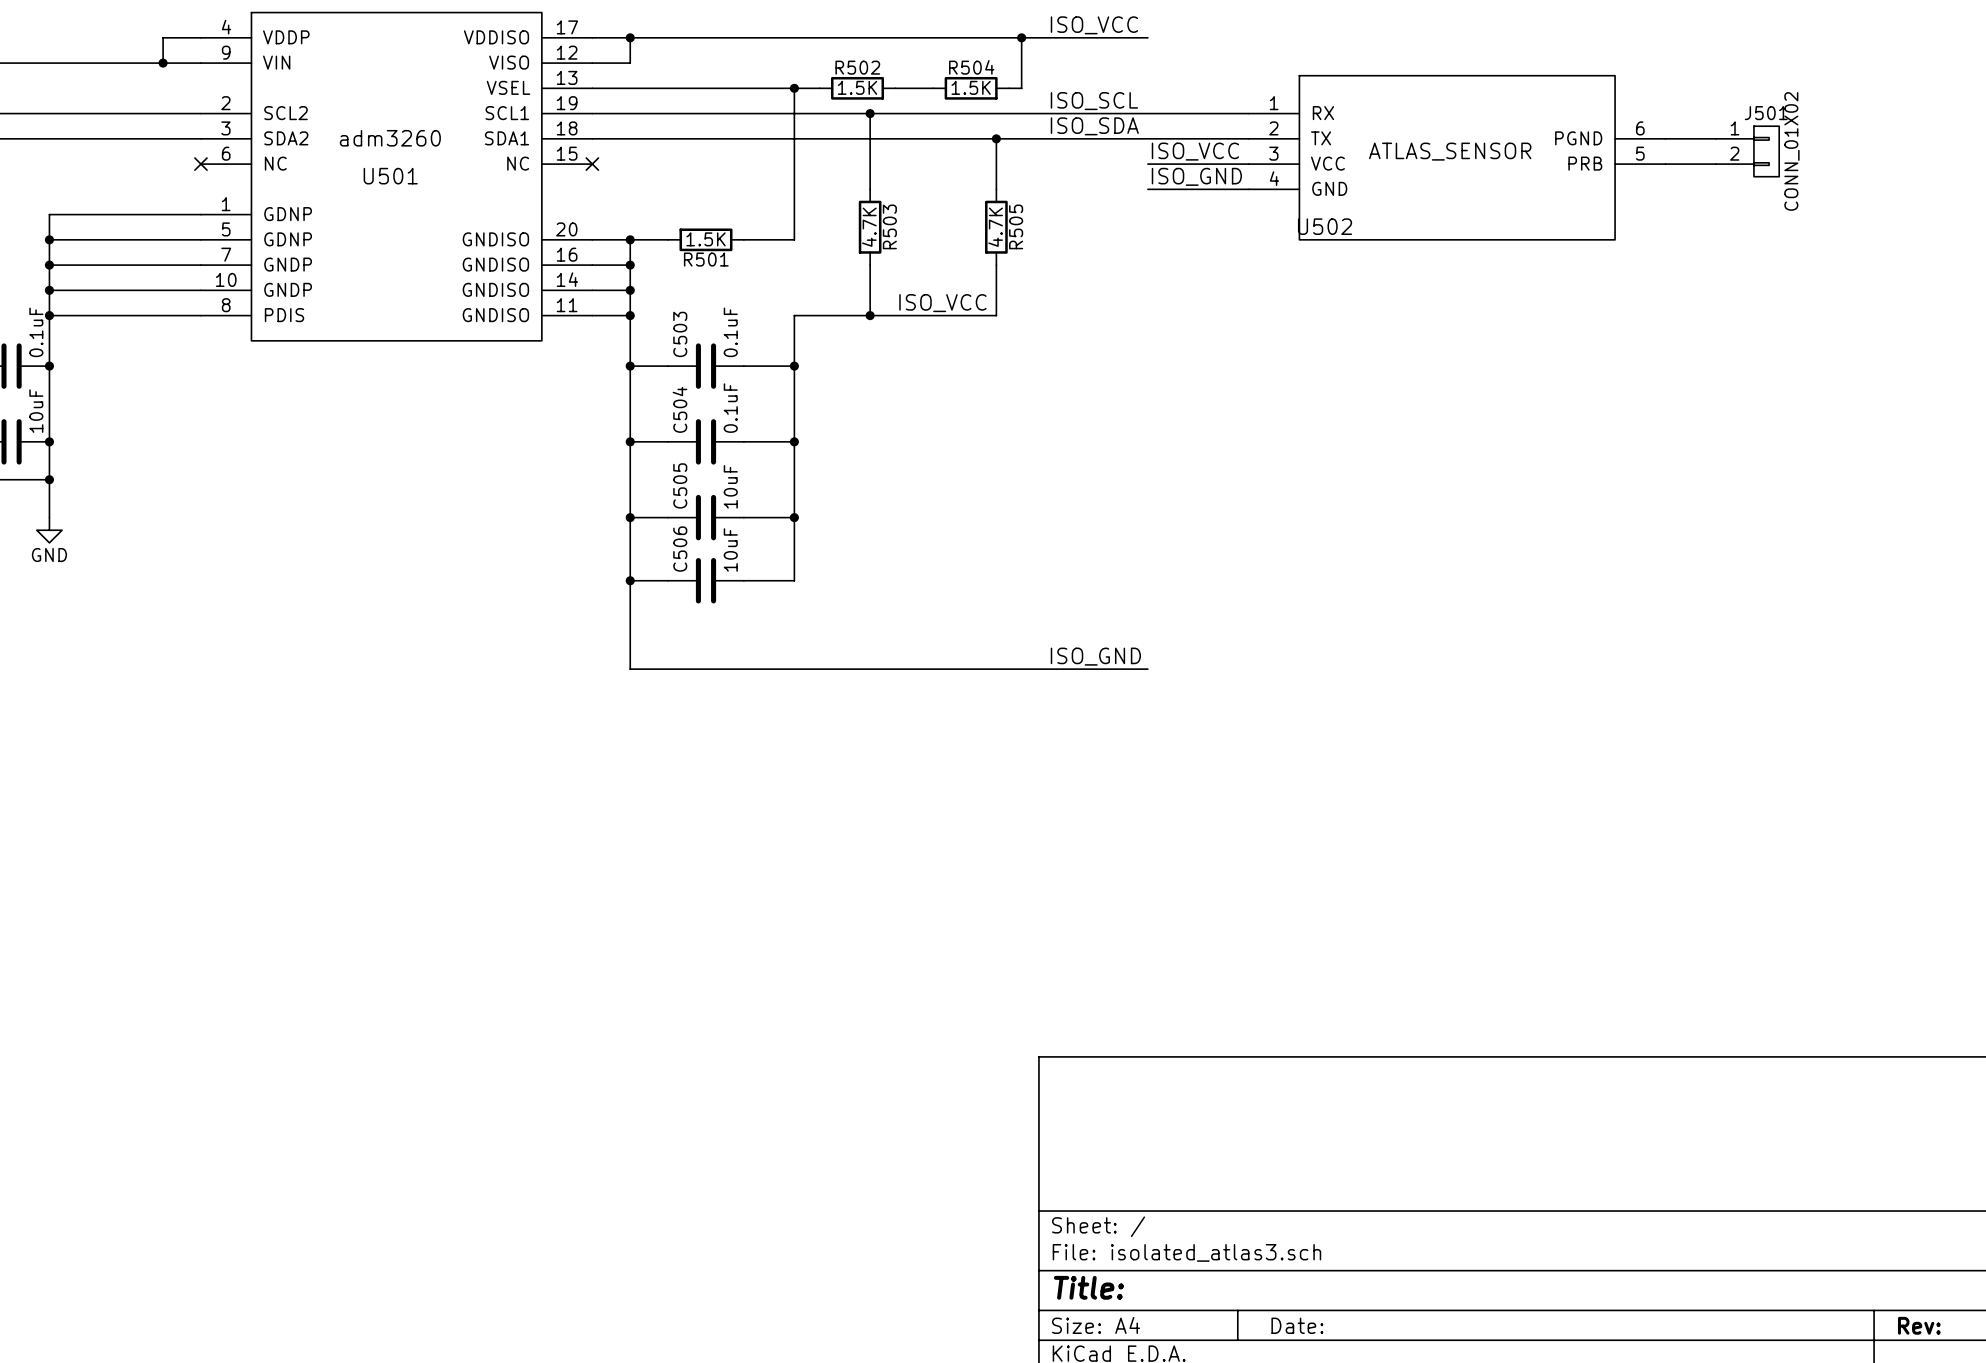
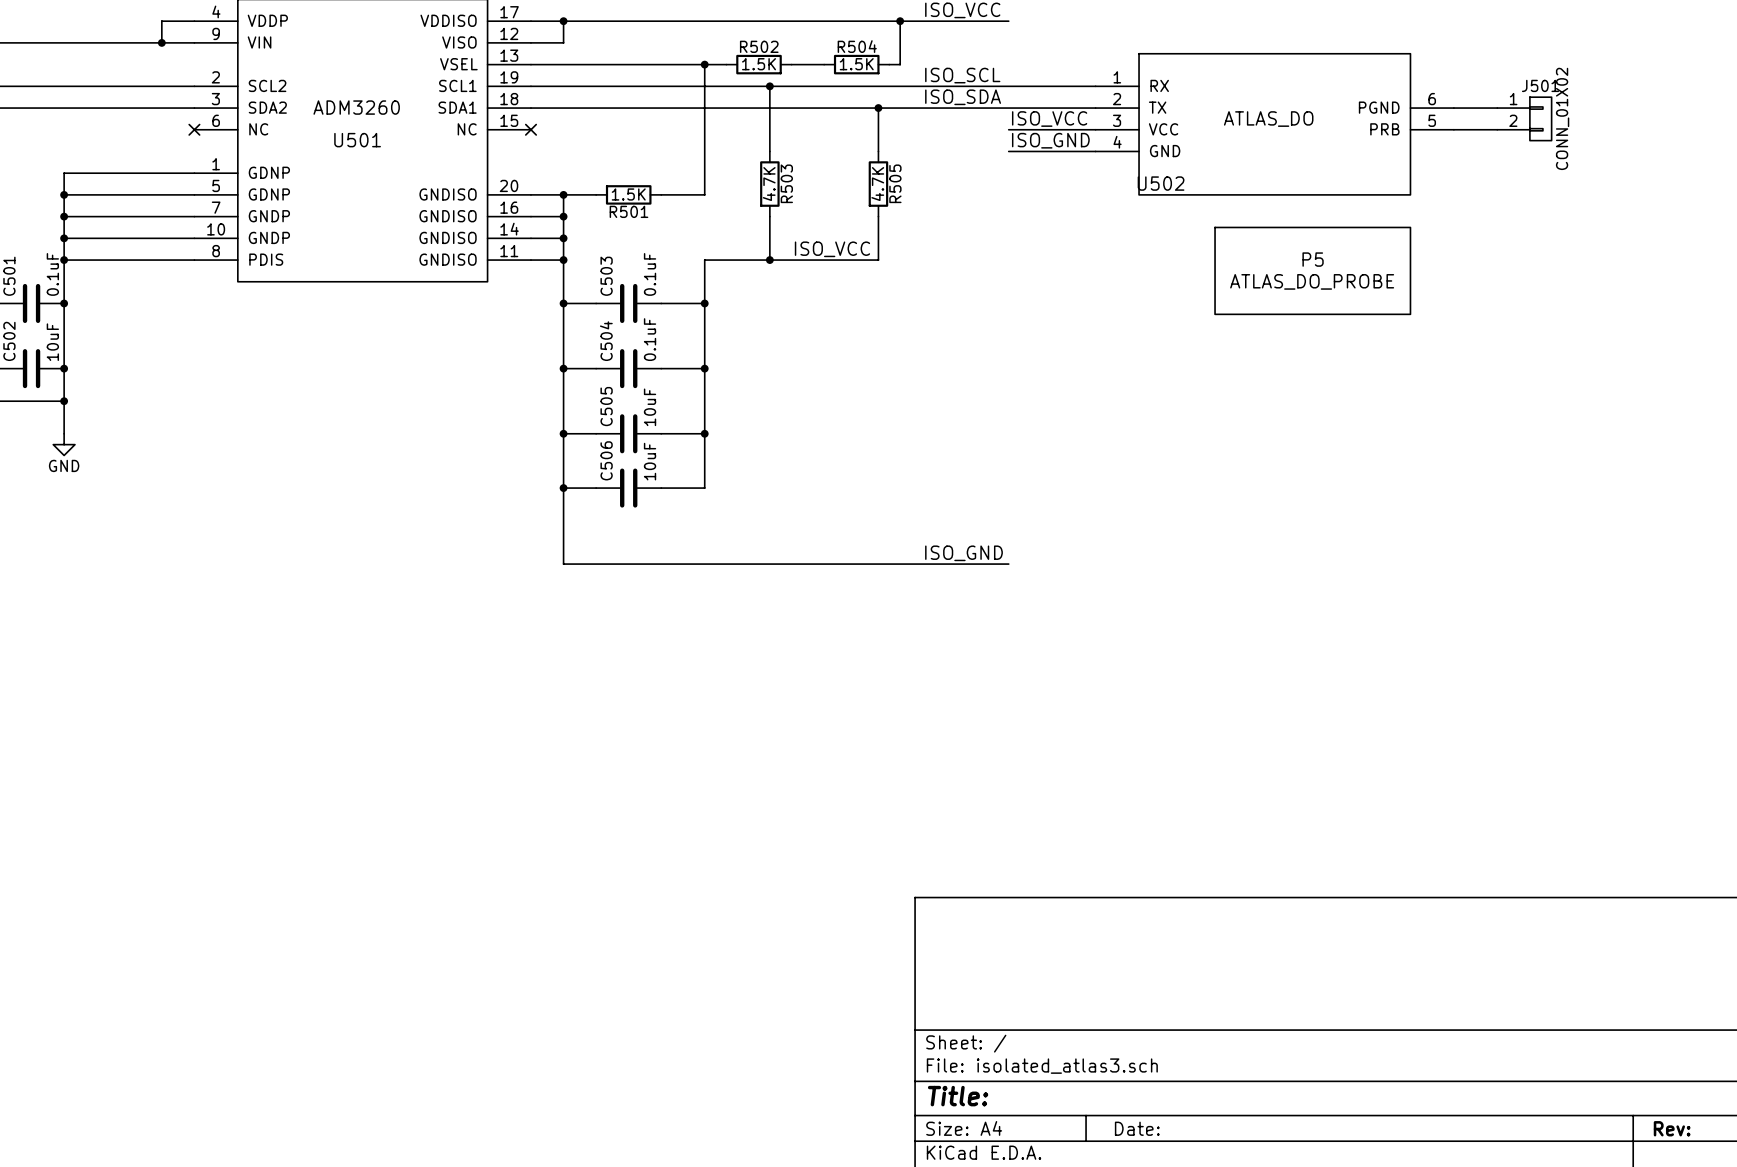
U501 value: adm3260 (390, 138) -> ADM3260 (356, 107)
U502 value: ATLAS_SENSOR (1450, 151) -> ATLAS_DO (1268, 119)
P5: none -> ATLAS_DO_PROBE (1312, 270)

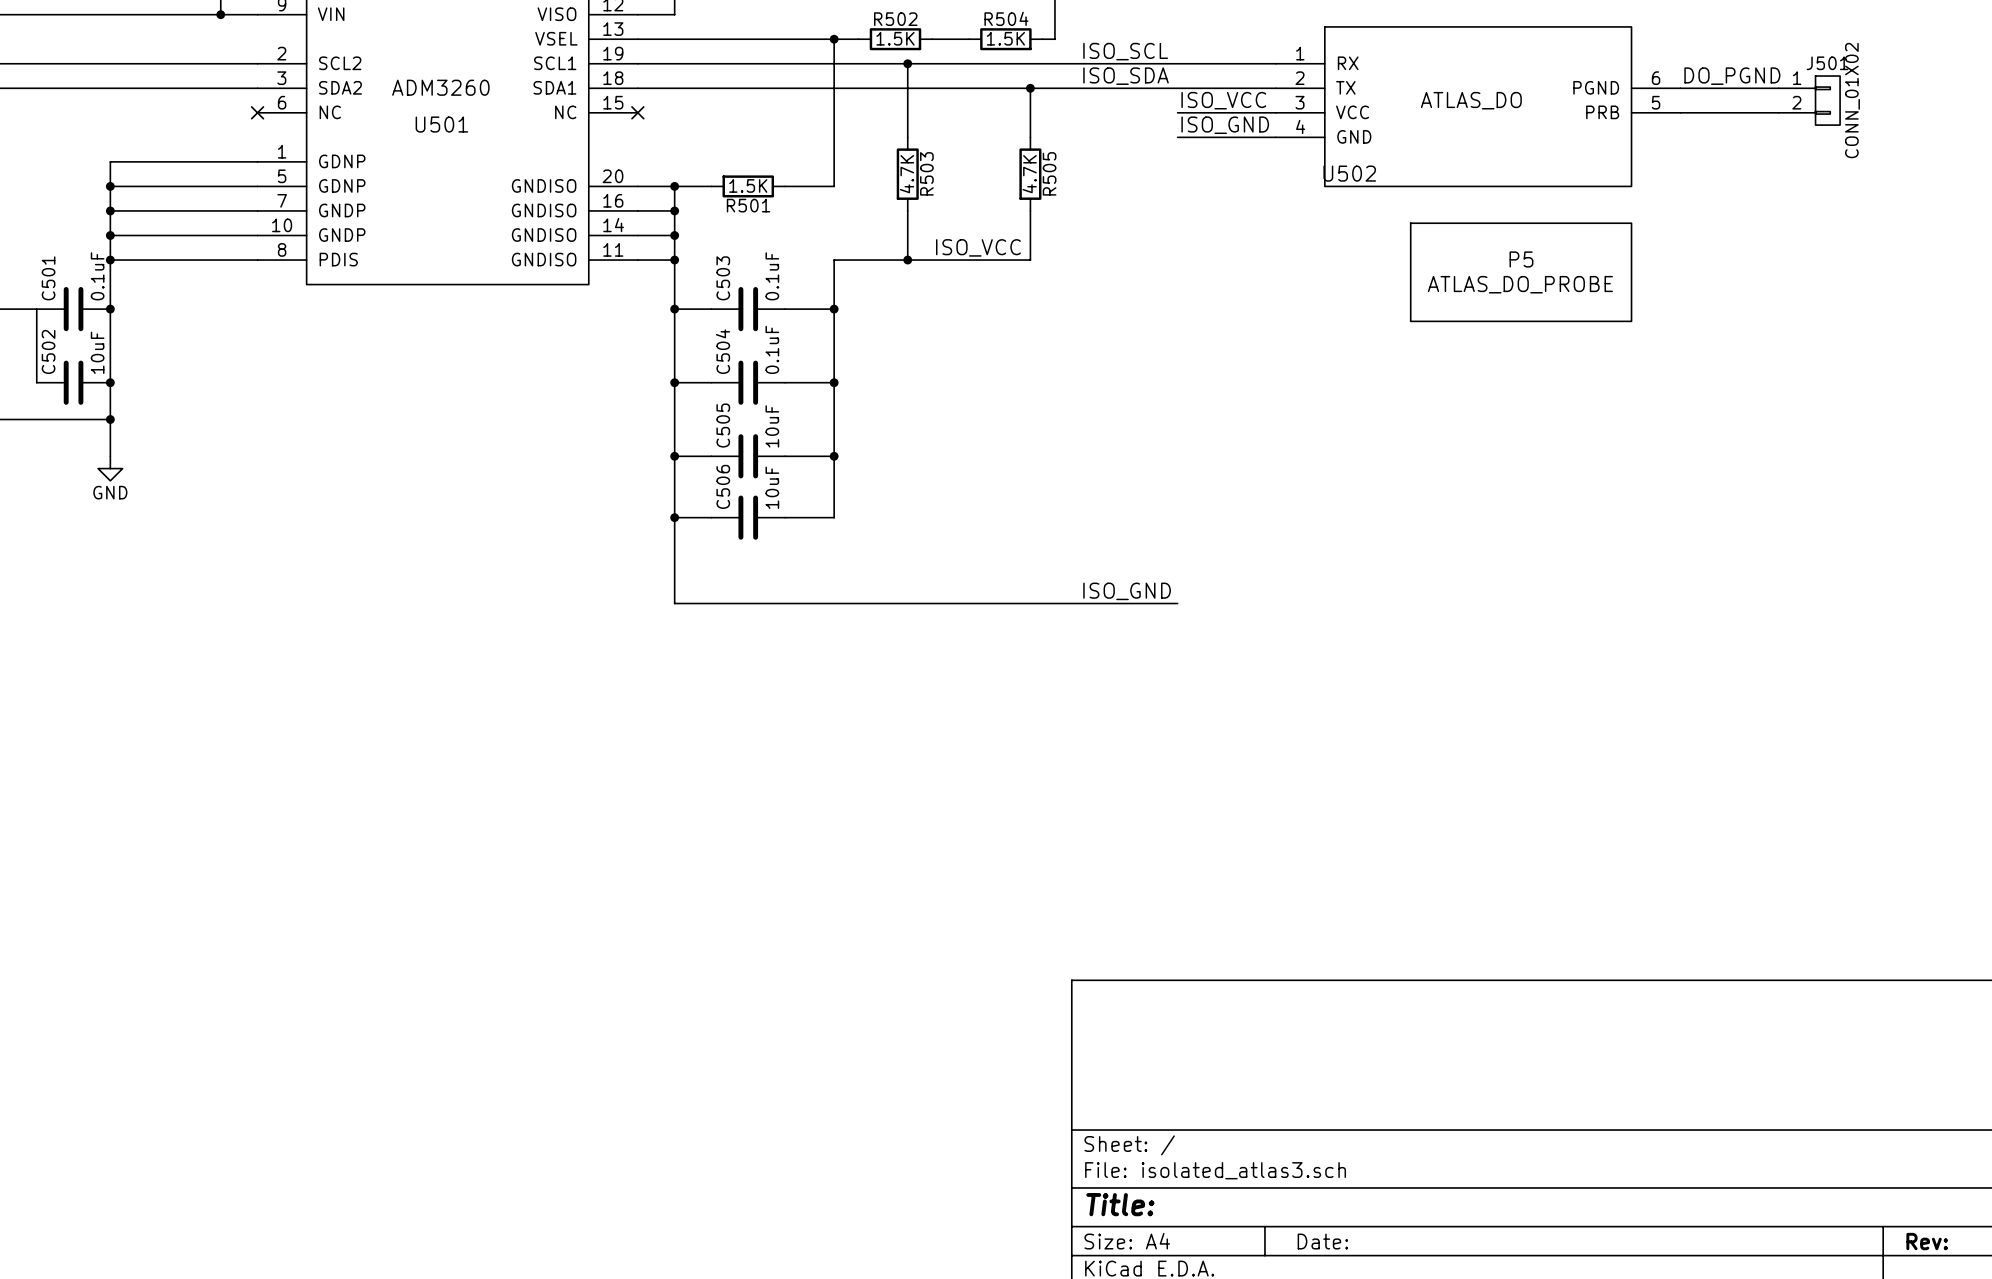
label: none -> DO_PGND (1732, 76)
J501 position: (1524, 118) -> (1809, 100)

